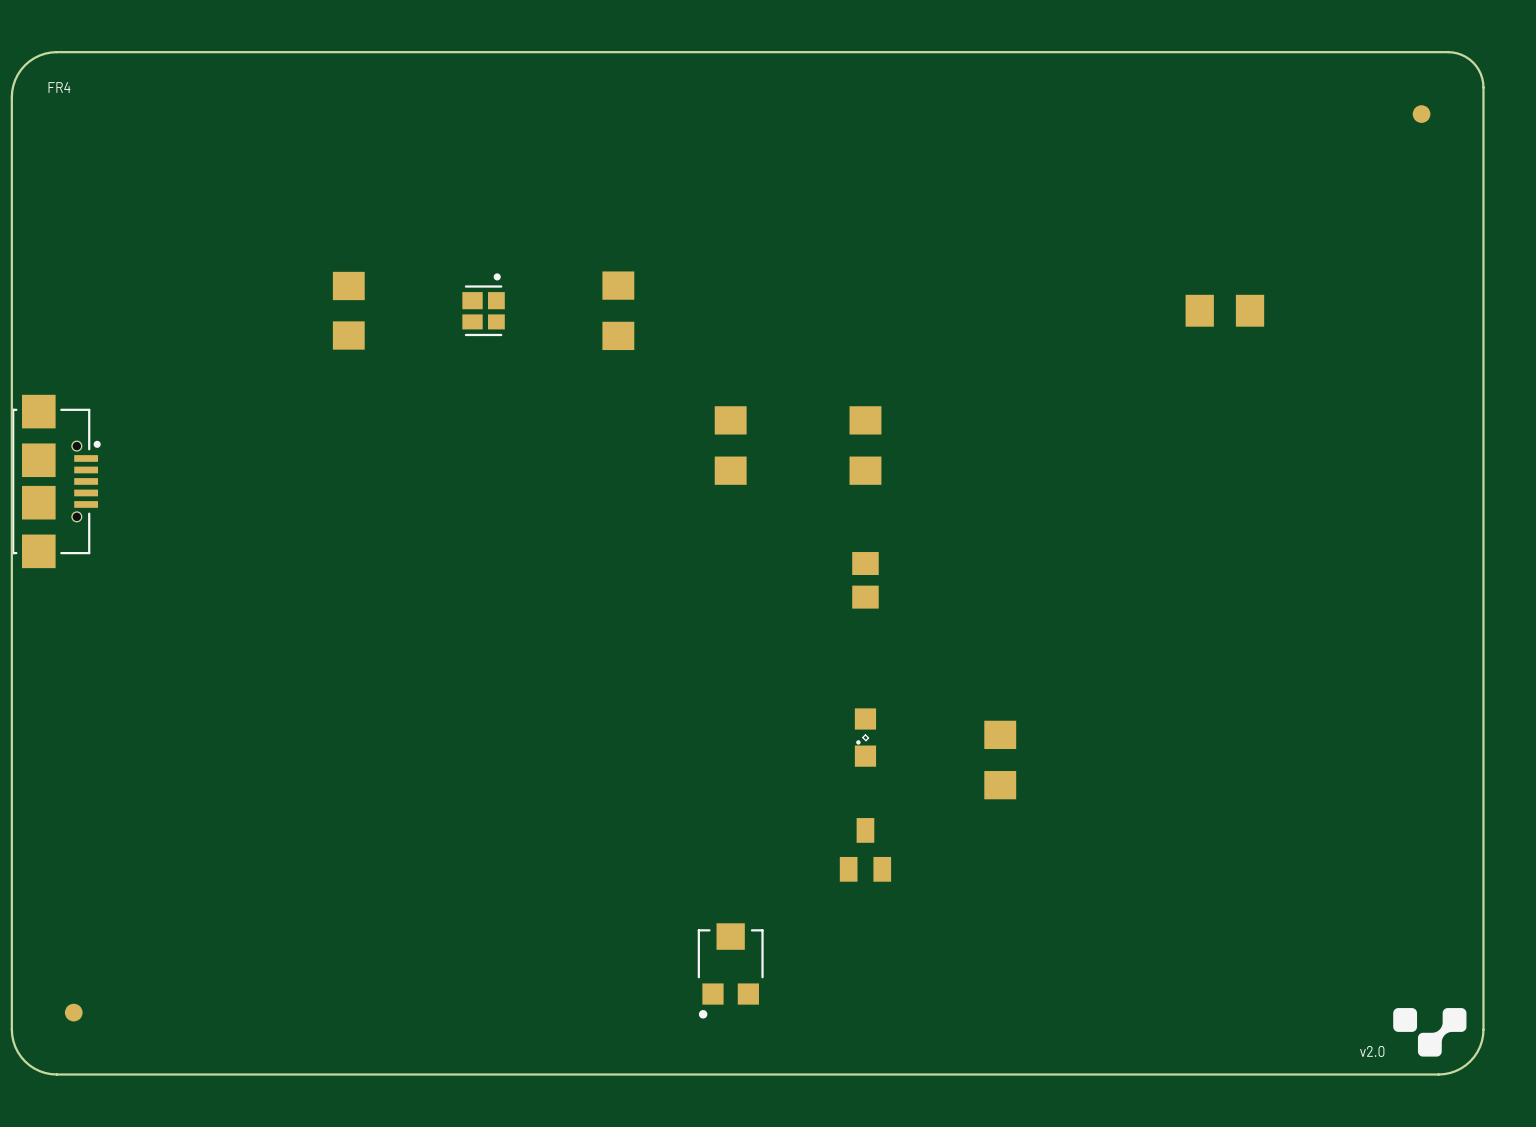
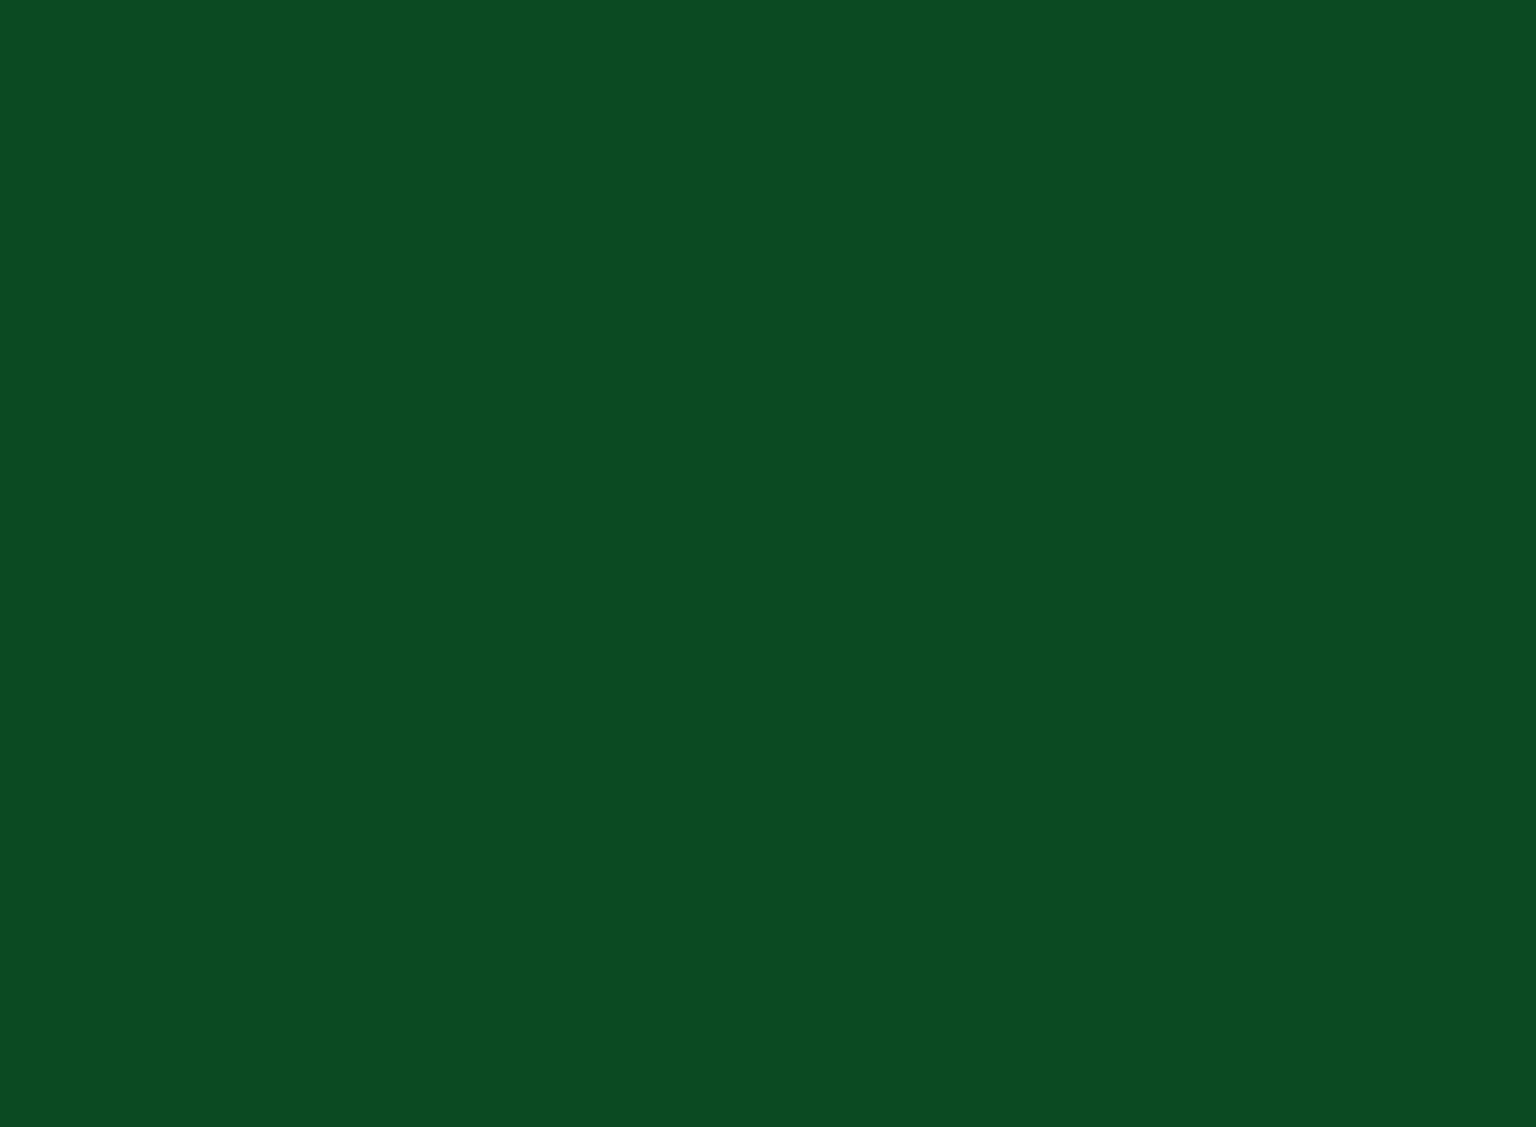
part: (483, 304) -> none
part: (348, 310) -> none
part: (618, 310) -> none
part: (1224, 310) -> none
part: (730, 445) -> none
part: (865, 445) -> none
part: (56, 481) -> none
part: (747, 563) -> none
part: (865, 580) -> none
part: (865, 737) -> none
part: (1000, 760) -> none
part: (865, 849) -> none
part: (730, 970) -> none

